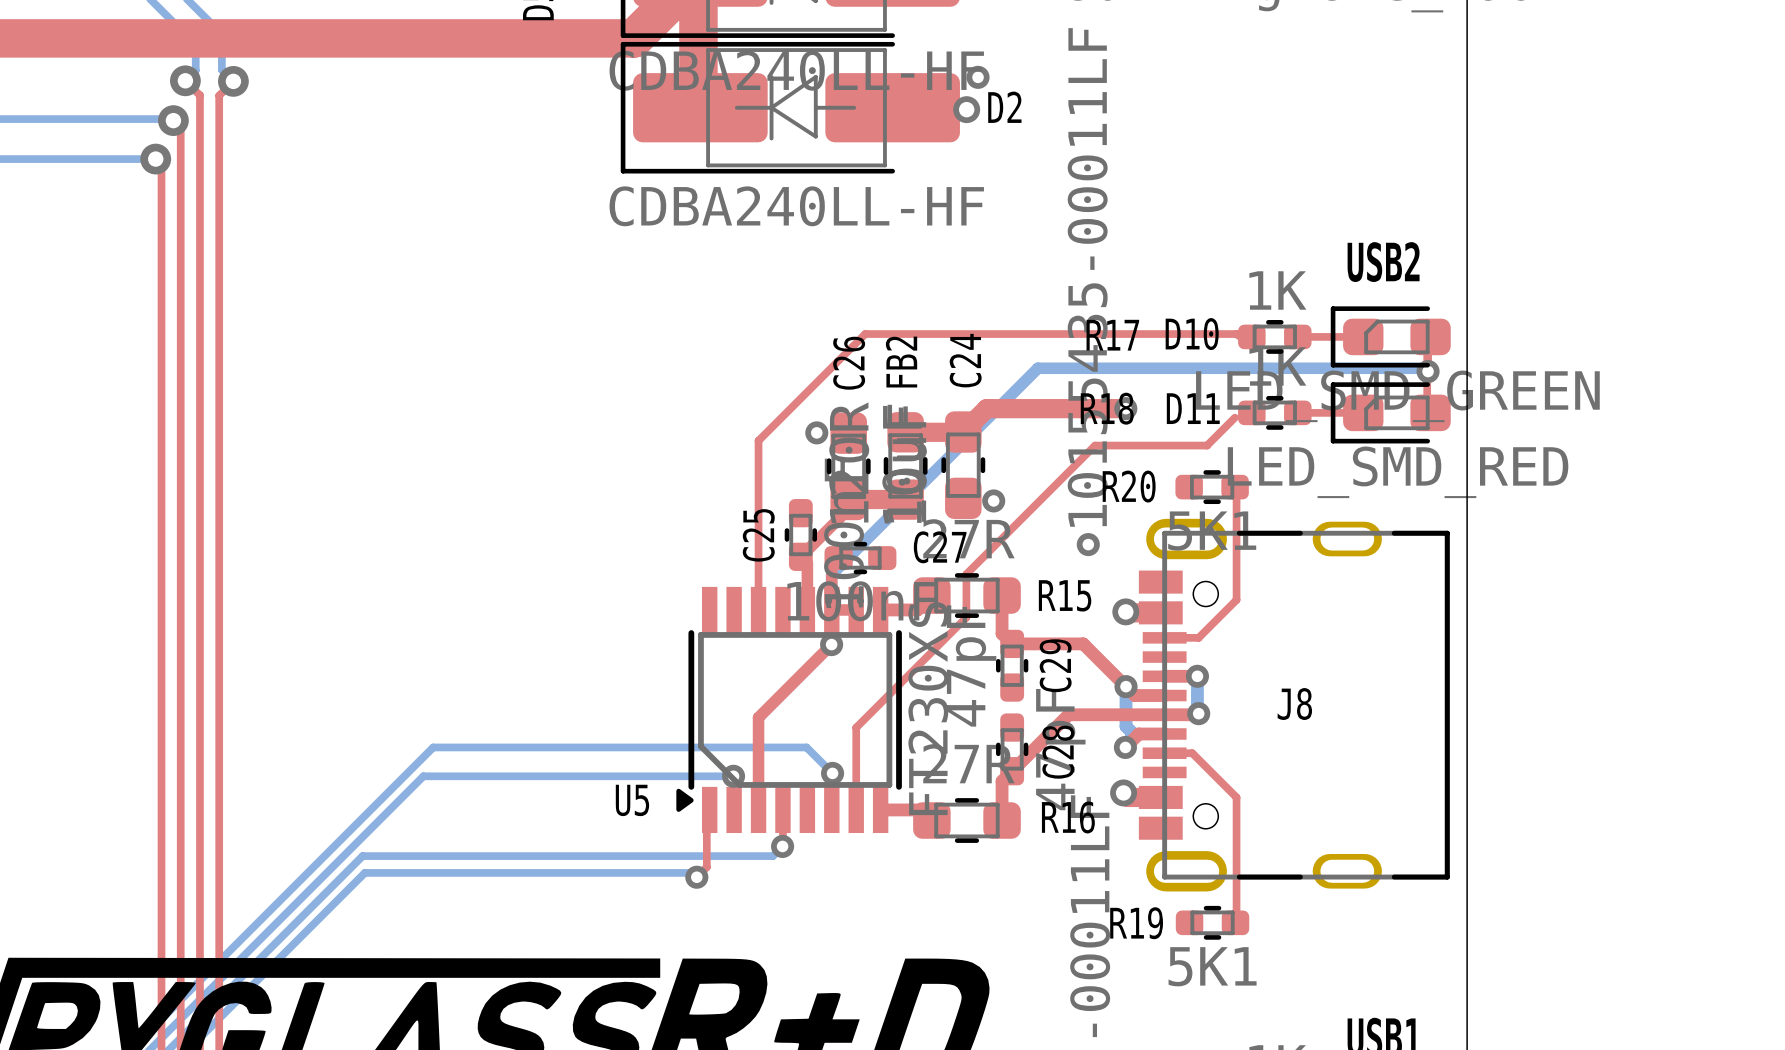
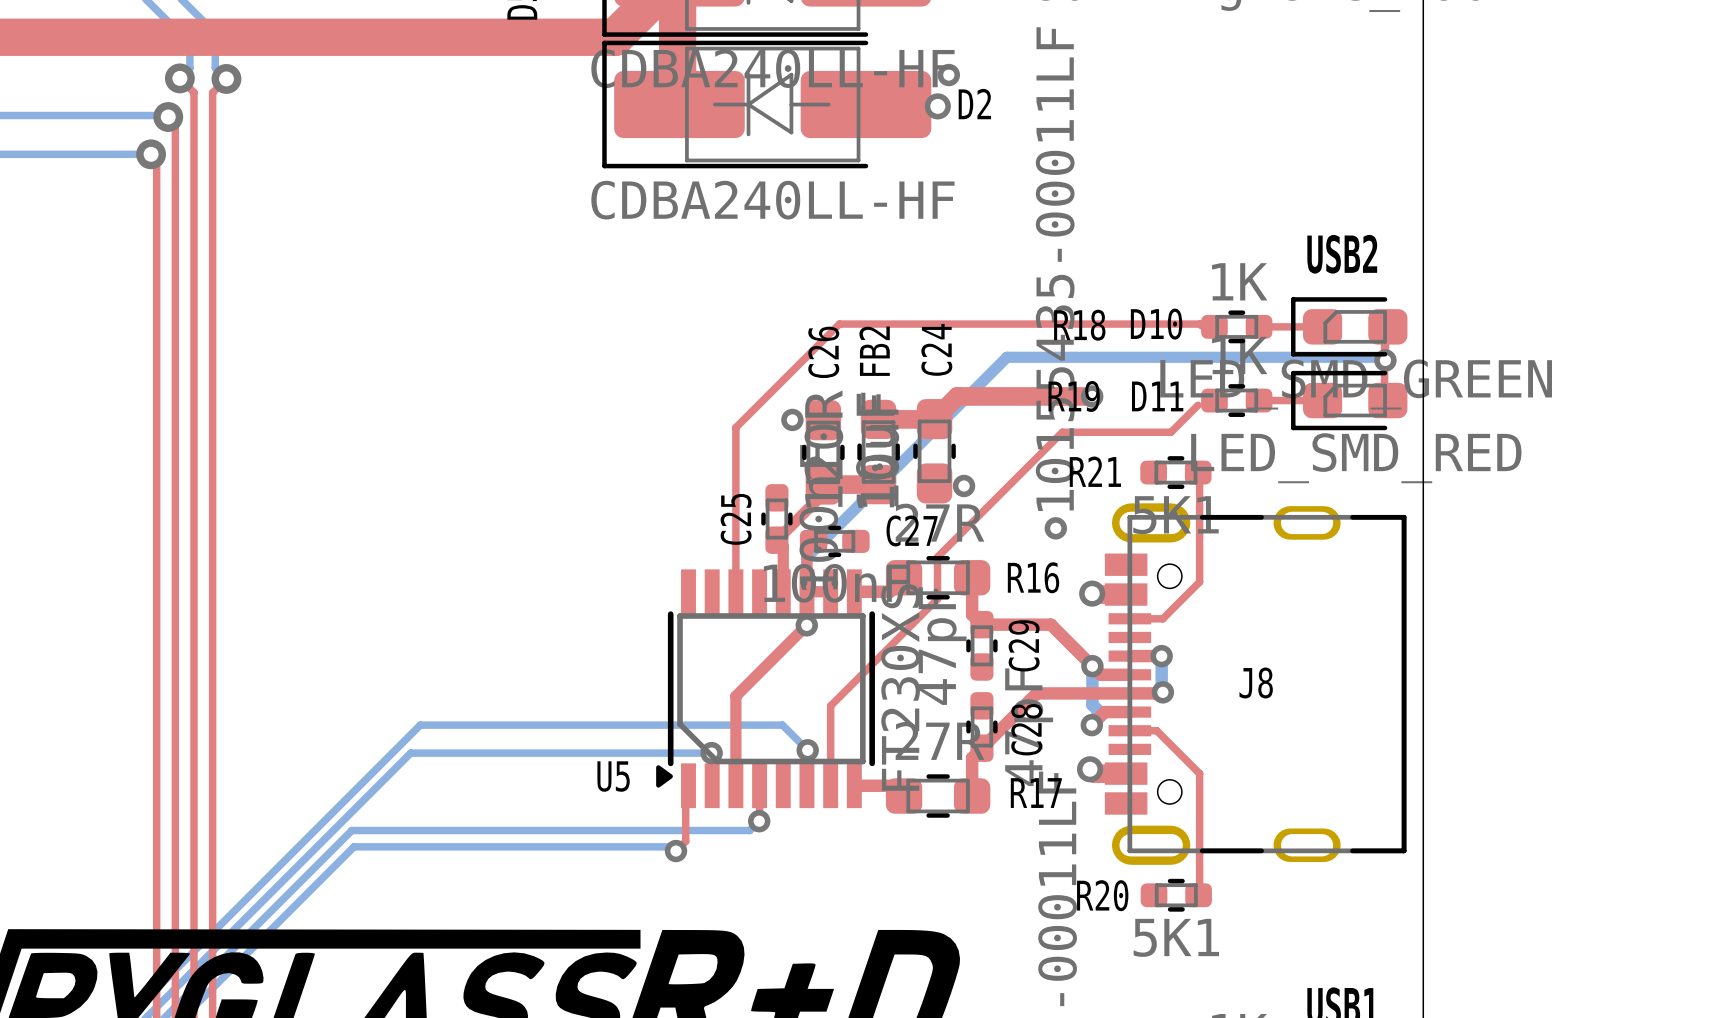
R17 name: R17 (1112, 335) -> R18 (1079, 325)
R18 name: R18 (1107, 408) -> R19 (1074, 396)
R20 name: R20 (1129, 486) -> R21 (1095, 471)
R15 name: R15 (1065, 595) -> R16 (1033, 577)
R16 name: R16 (1068, 817) -> R17 (1036, 793)
R19 name: R19 (1136, 923) -> R20 (1102, 895)

